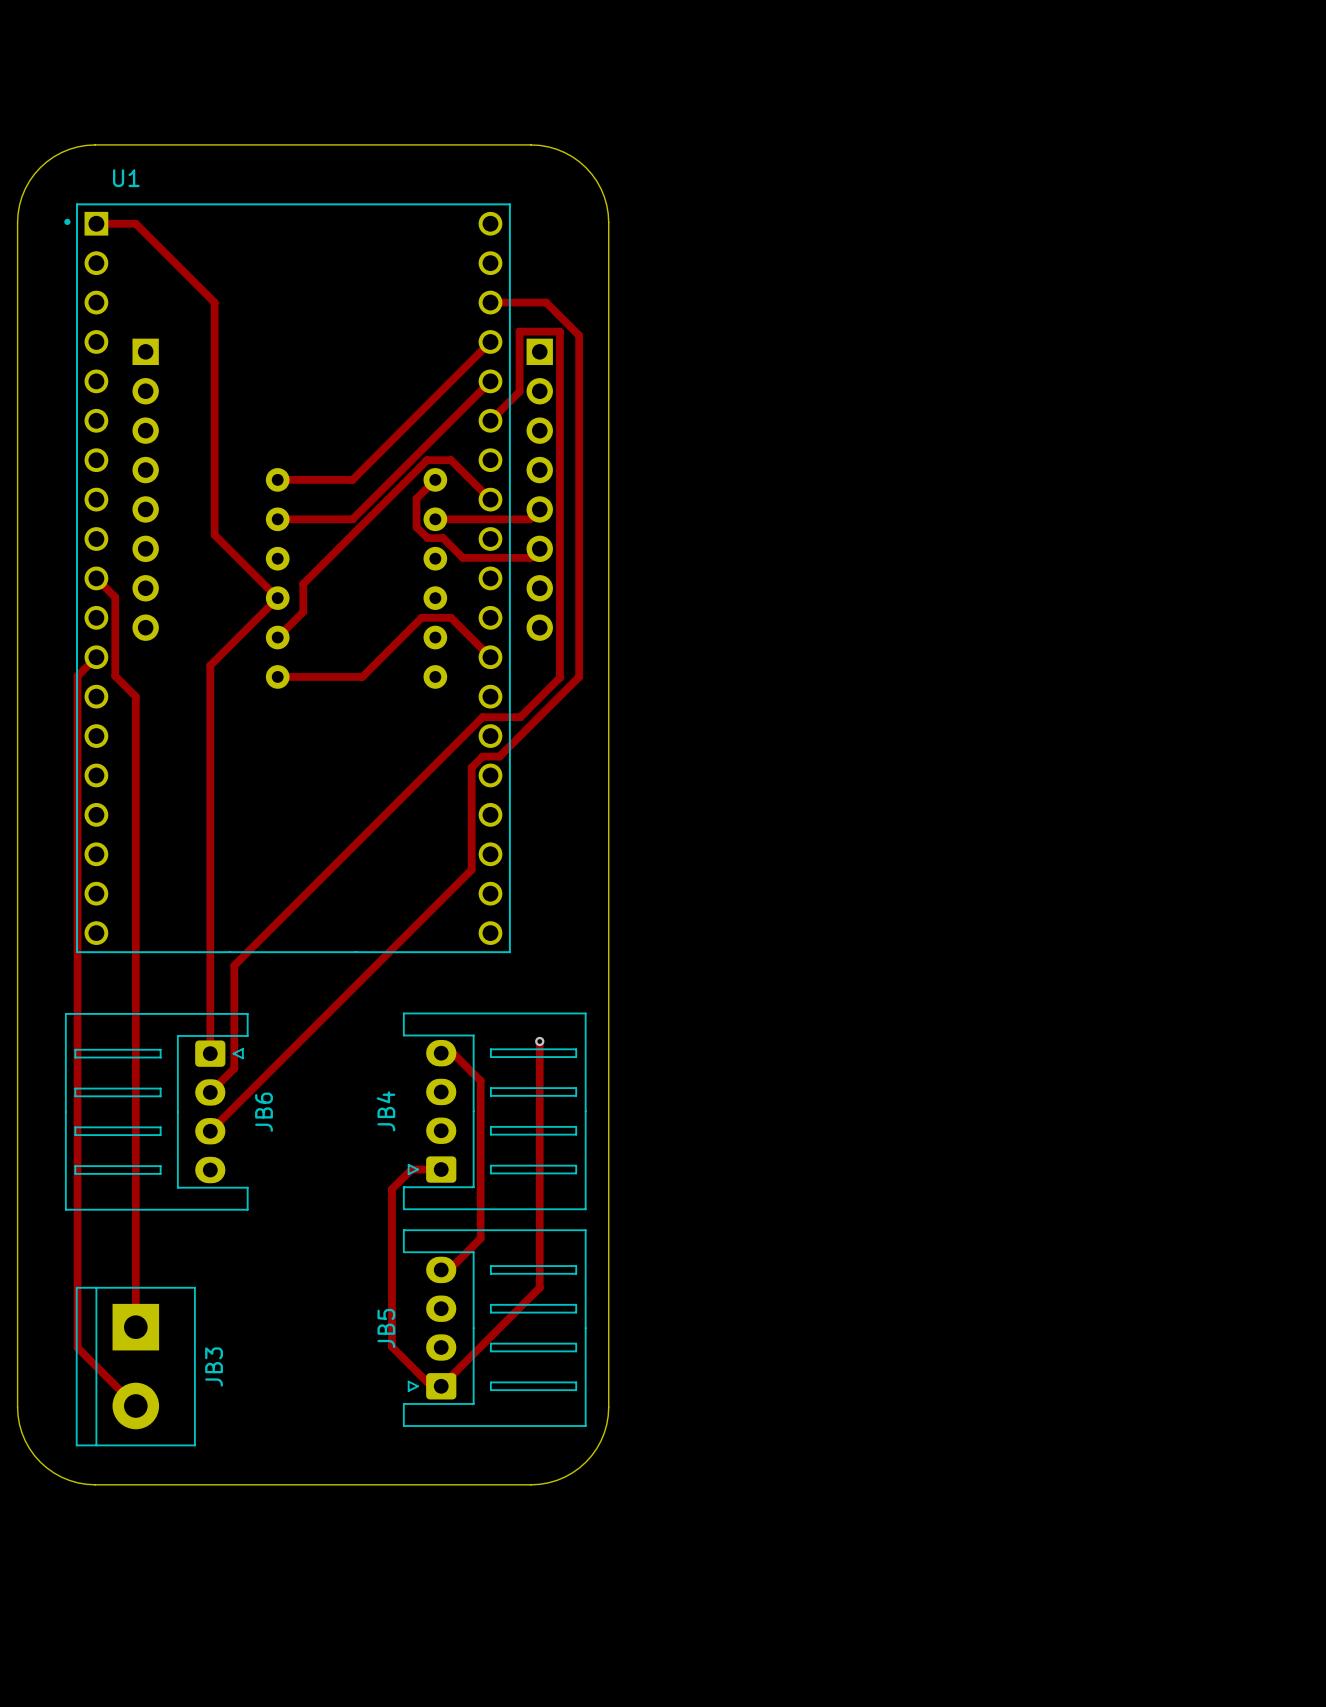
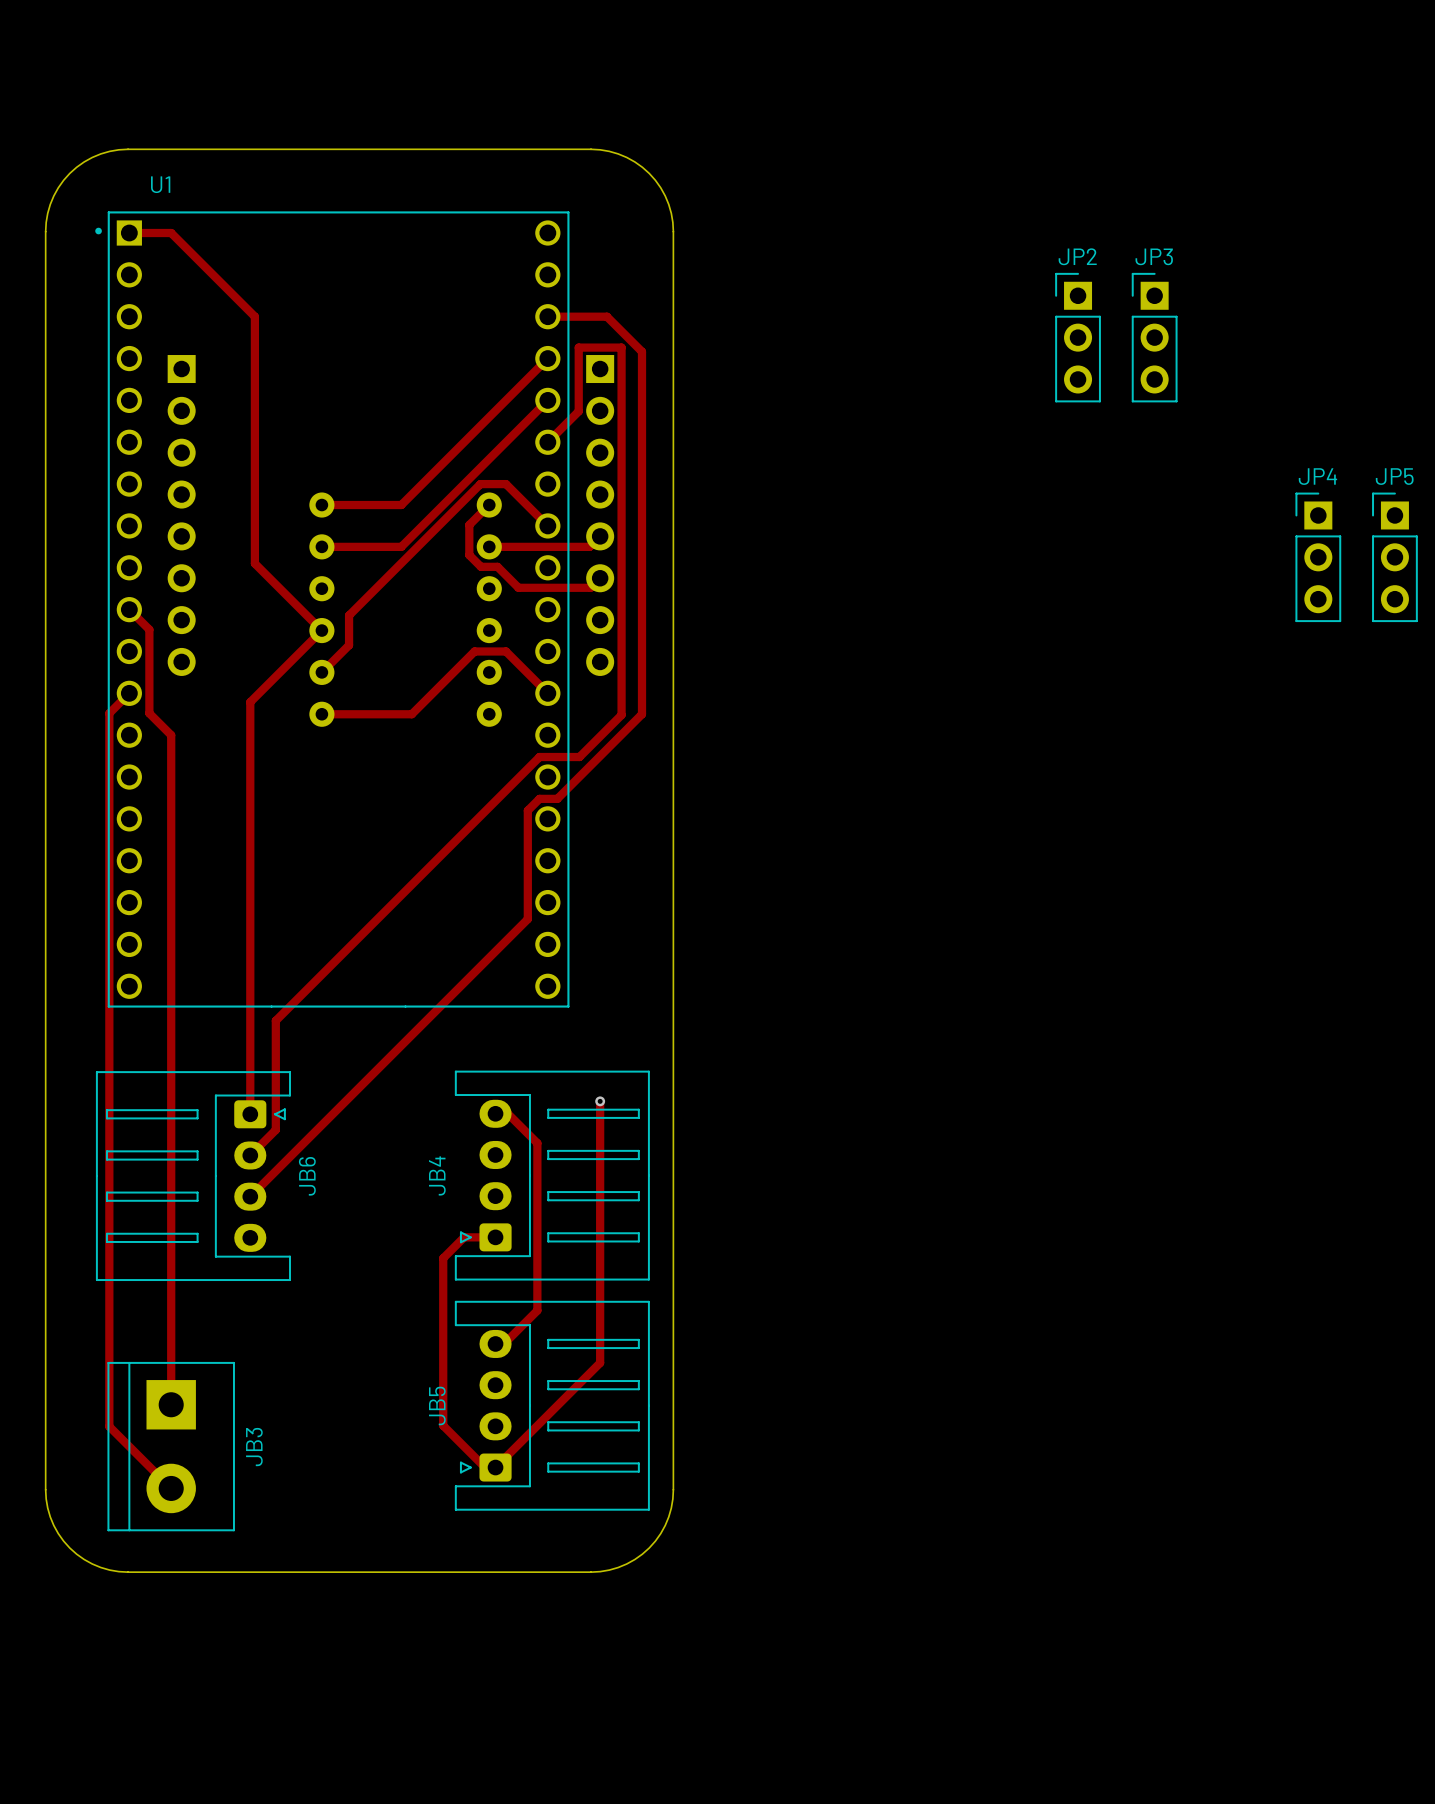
JP2: none -> (1078, 337)
JP3: none -> (1154, 337)
JP4: none -> (1318, 557)
JP5: none -> (1394, 557)

